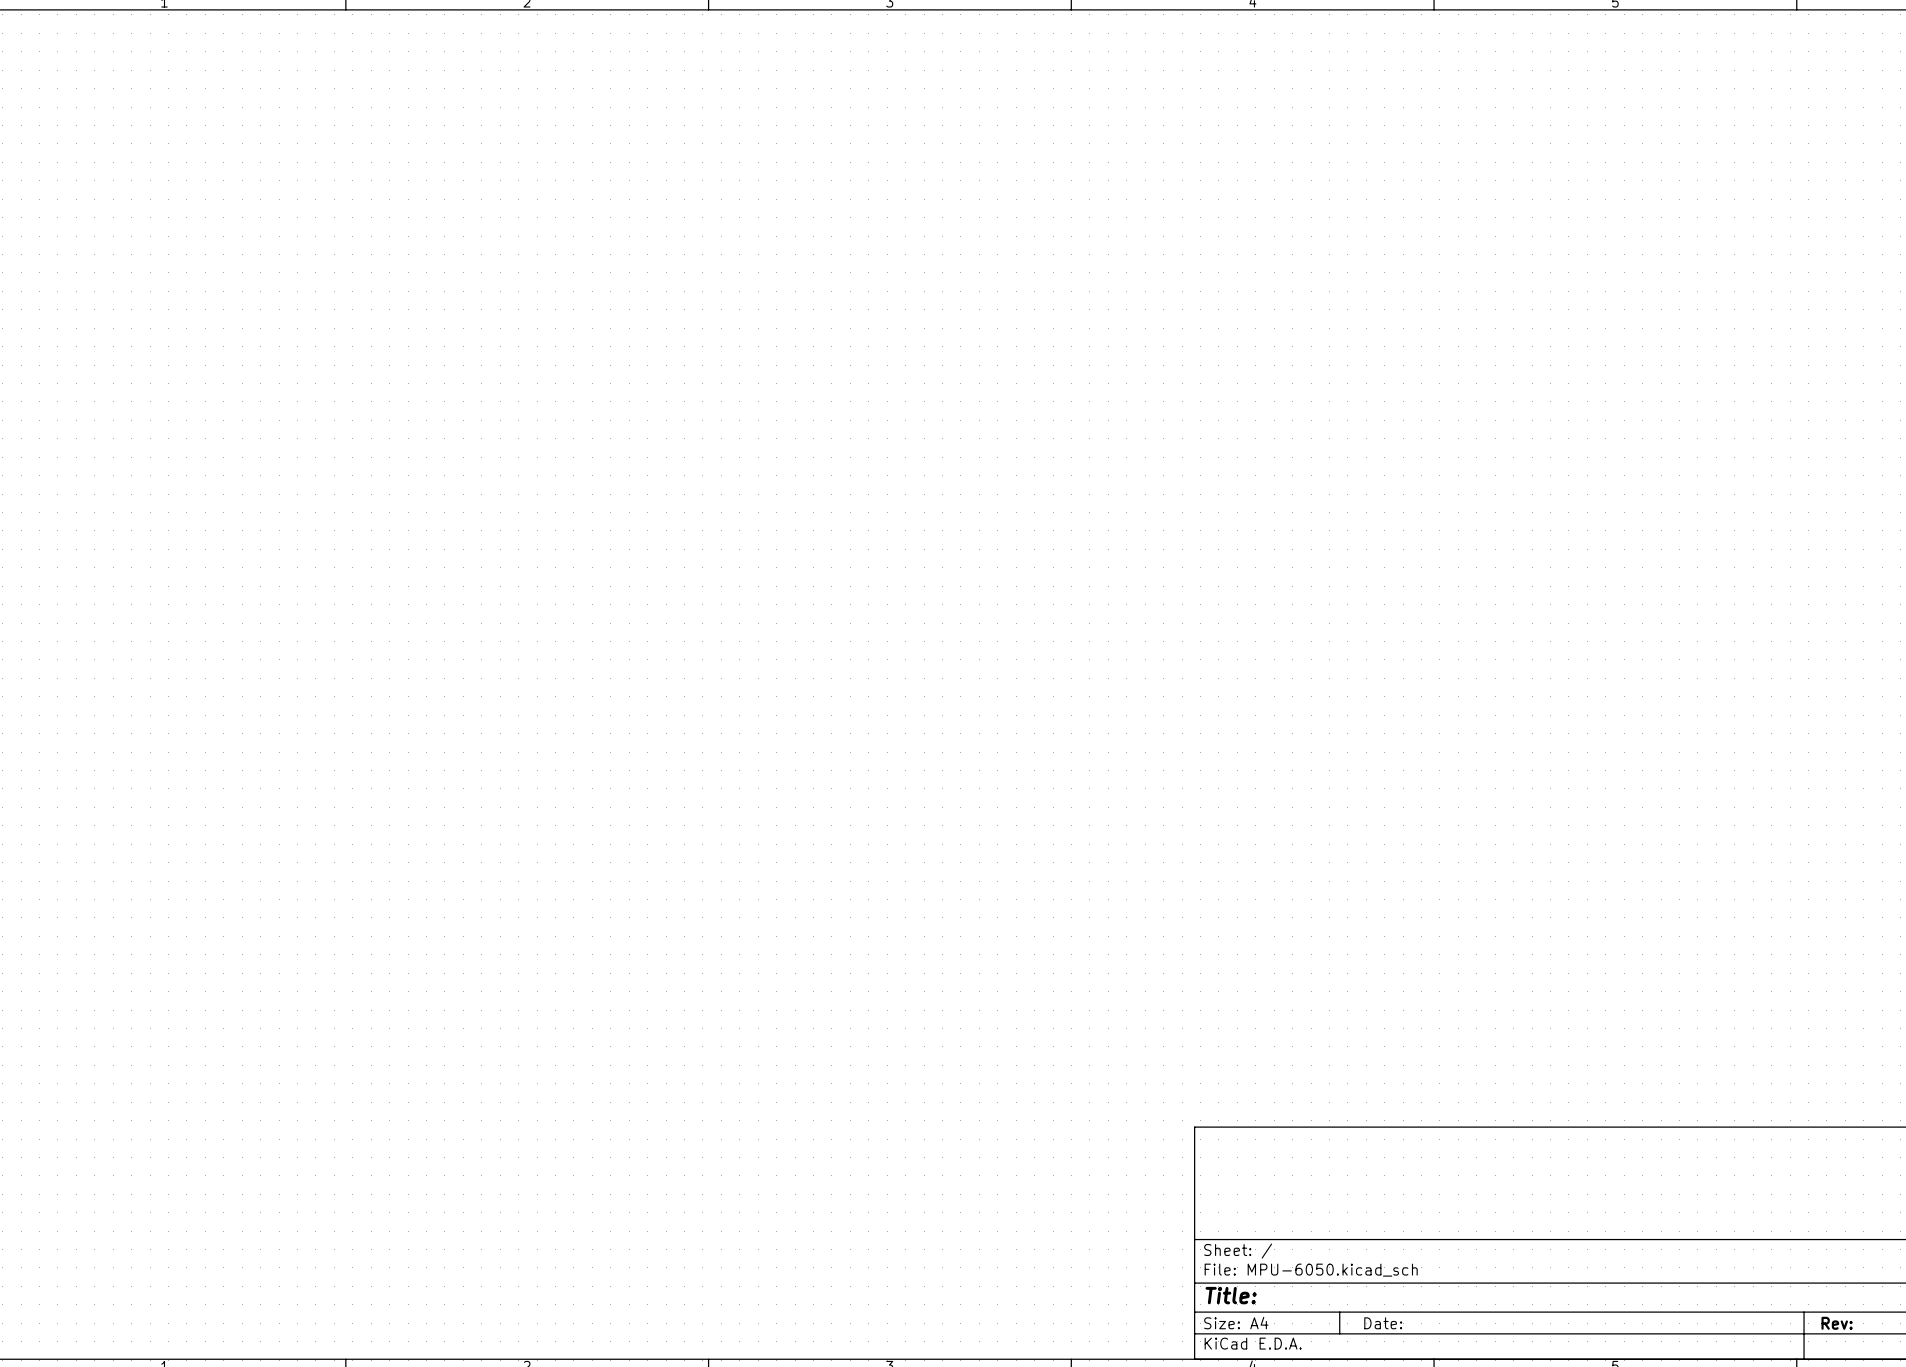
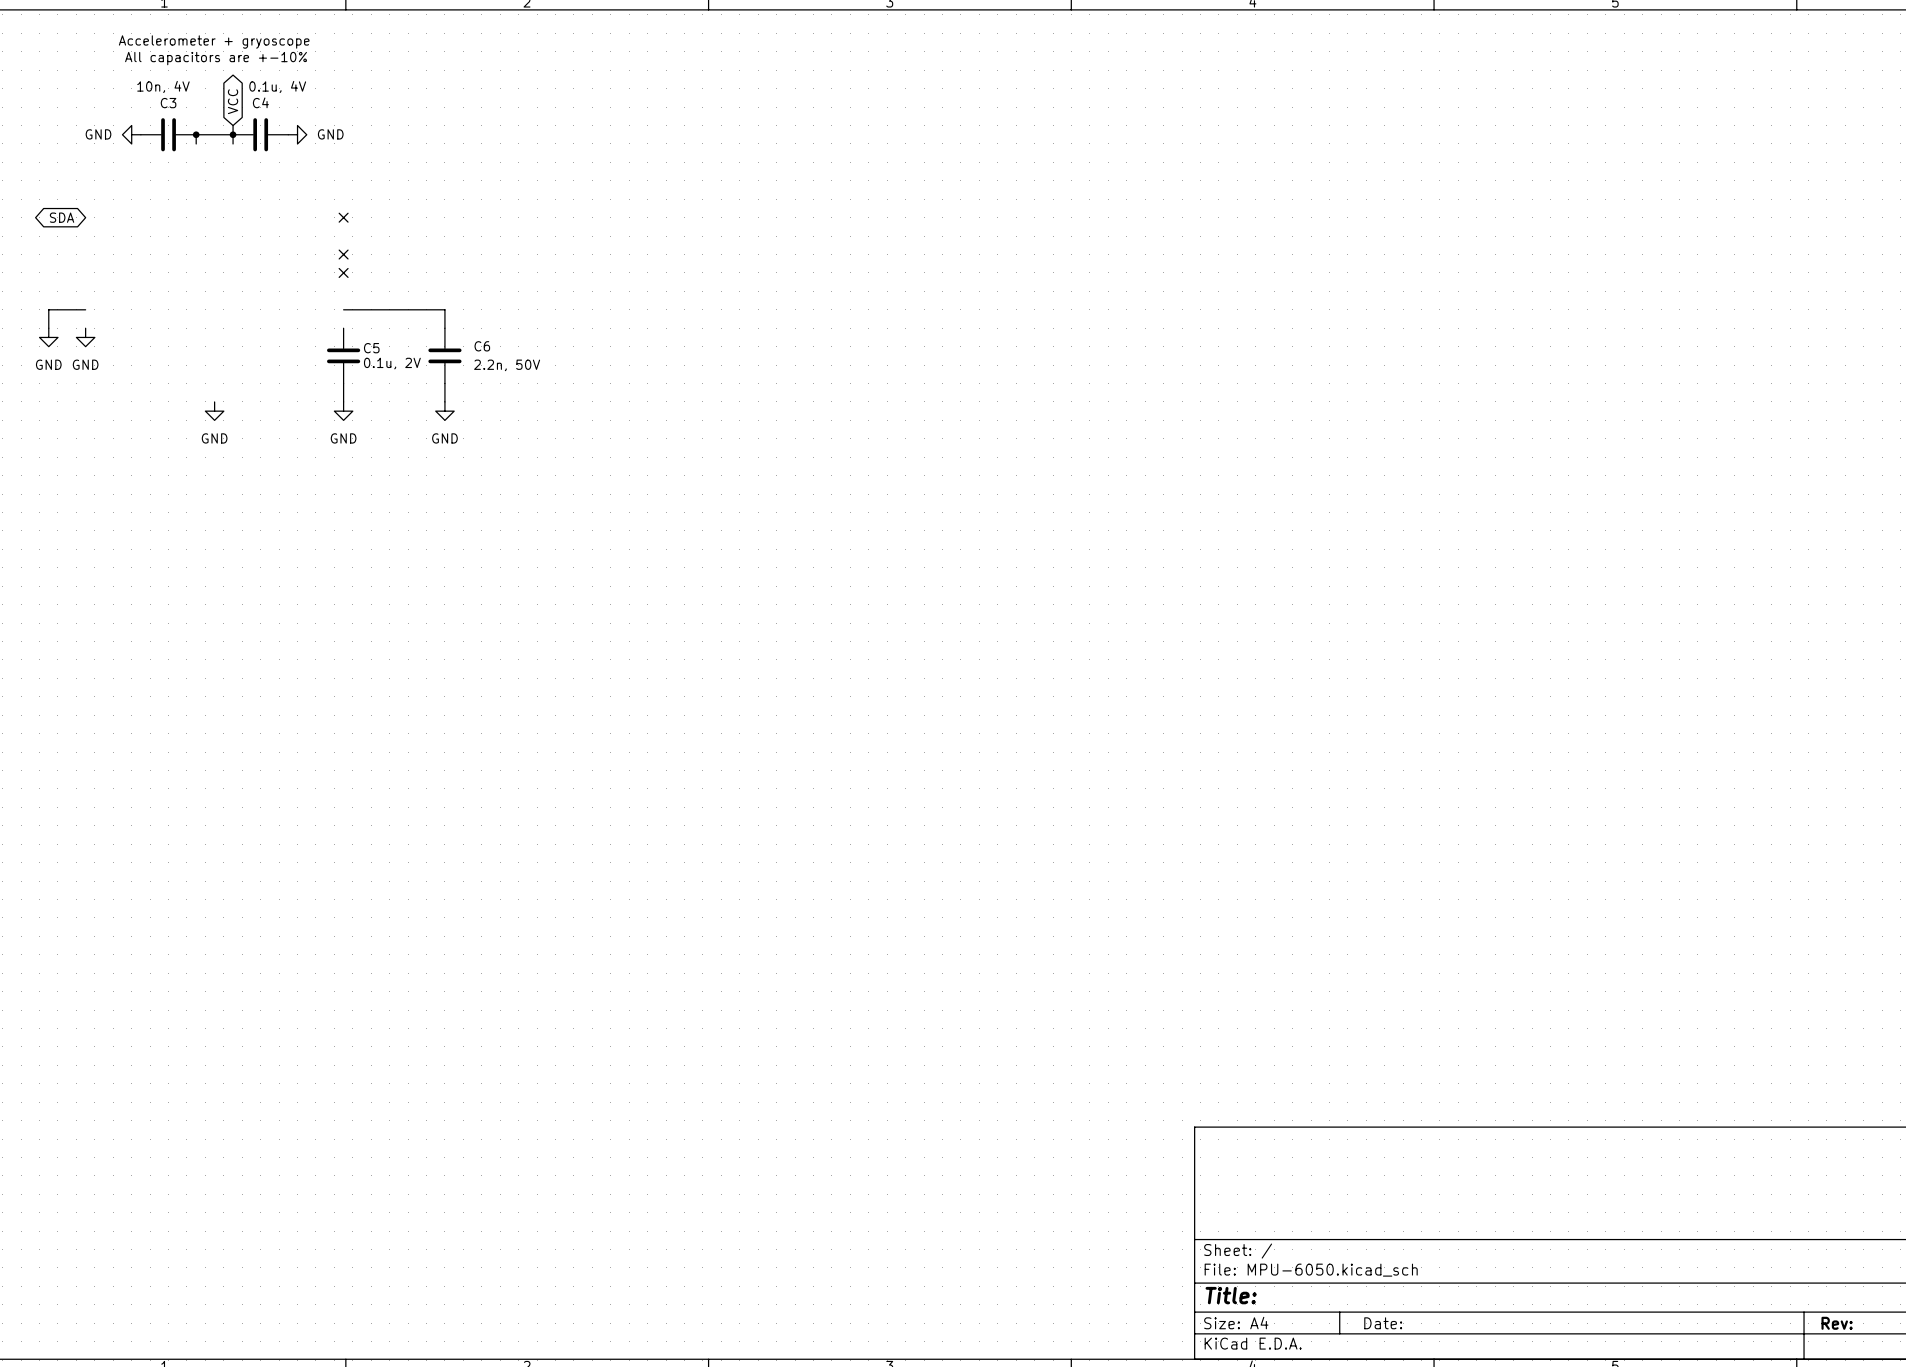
text: none -> Accelerometer + gryoscope (214, 42)
text: none -> All capacitors are +-10% (216, 58)
global label: none -> VCC (233, 101)
wire: none -> (233, 125) (233, 143)
power symbol: none -> GND (131, 134)
C3: none -> 10n, 4V (168, 134)
junction: none -> (196, 134)
wire: none -> (233, 134) (196, 134) (196, 143)
junction: none -> (233, 134)
C4: none -> 0.1u, 4V (260, 134)
power symbol: none -> GND (297, 134)
global label: none -> SDA (62, 217)
no-connect mark: none -> (343, 217)
no-connect mark: none -> (343, 254)
no-connect mark: none -> (343, 272)
wire: none -> (85, 309) (48, 309) (48, 328)
wire: none -> (343, 309) (444, 309) (444, 328)
power symbol: none -> GND (48, 337)
power symbol: none -> GND (85, 337)
C5: none -> 0.1u, 2V (343, 355)
C6: none -> 2.2n, 50V (444, 355)
wire: none -> (343, 383) (343, 401)
wire: none -> (444, 383) (444, 401)
power symbol: none -> GND (214, 411)
power symbol: none -> GND (343, 411)
power symbol: none -> GND (444, 411)

